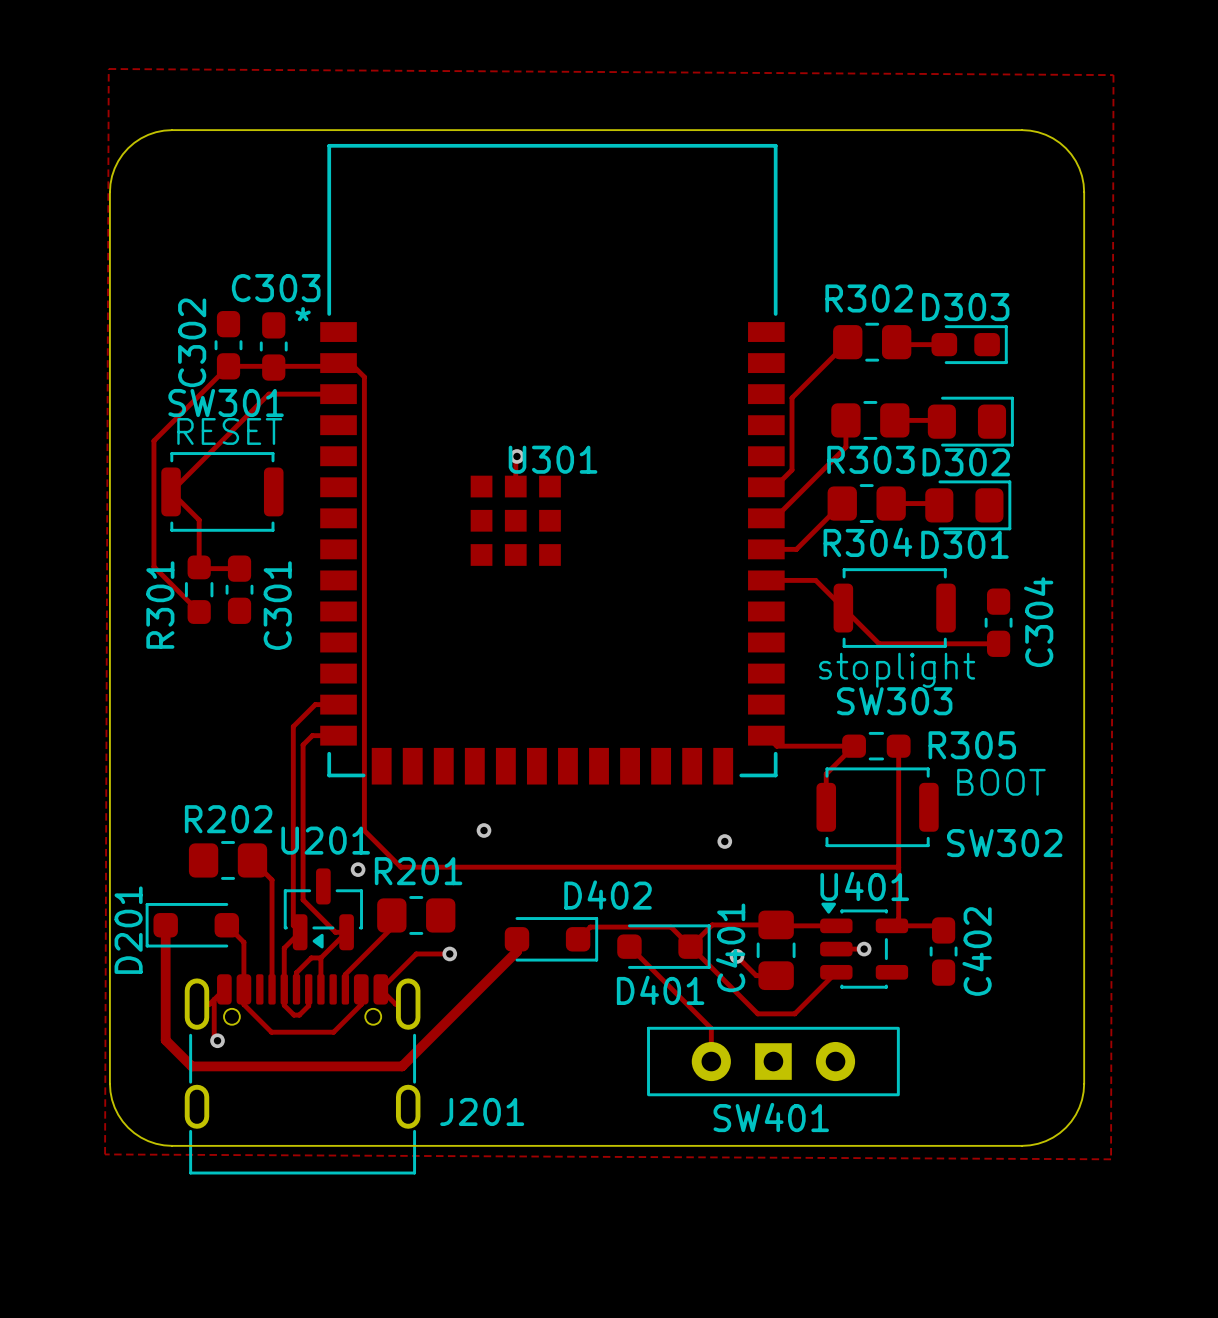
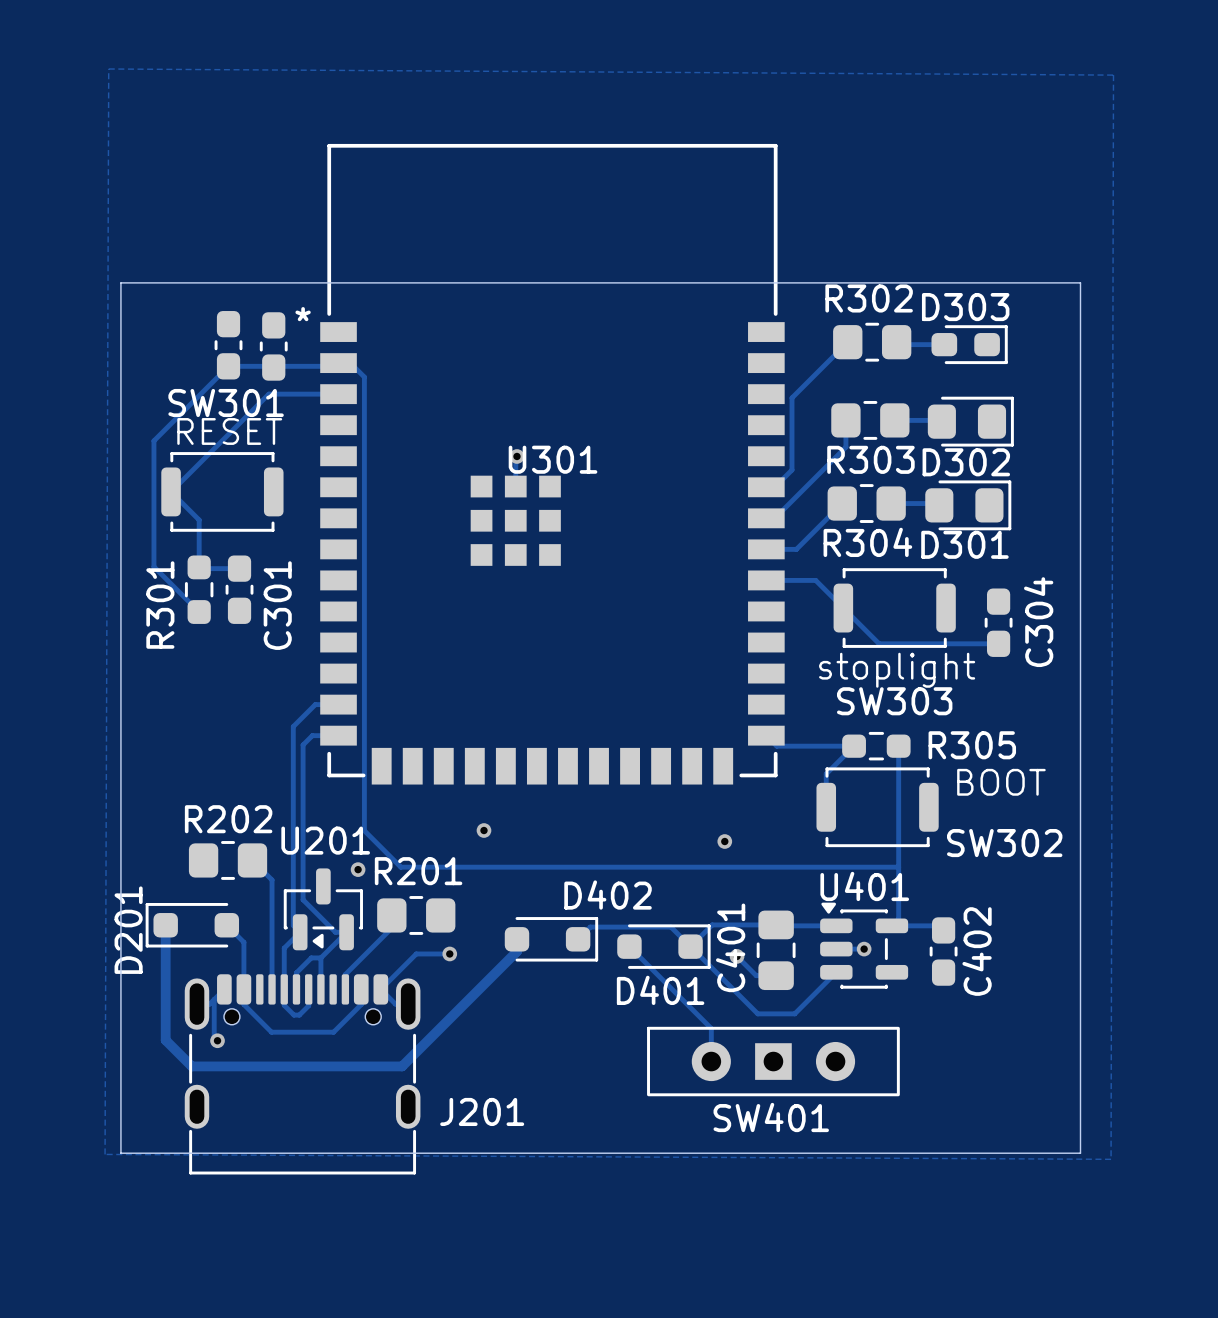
board edge: (172, 130) (1022, 130) (1045, 134) (1065, 148) (1079, 168) (1084, 192) (1084, 1083) (1079, 1107) (1065, 1127) (1045, 1141) (1022, 1145) (172, 1145) (148, 1141) (128, 1127) (114, 1107) (109, 1083) (109, 192) (114, 168) (128, 148) (148, 134) (172, 130) -> (120, 282) (120, 1153) (1080, 1153) (1080, 282) (120, 282)
C303 name: C303 (276, 288) -> none
C302 name: C302 (192, 342) -> none

